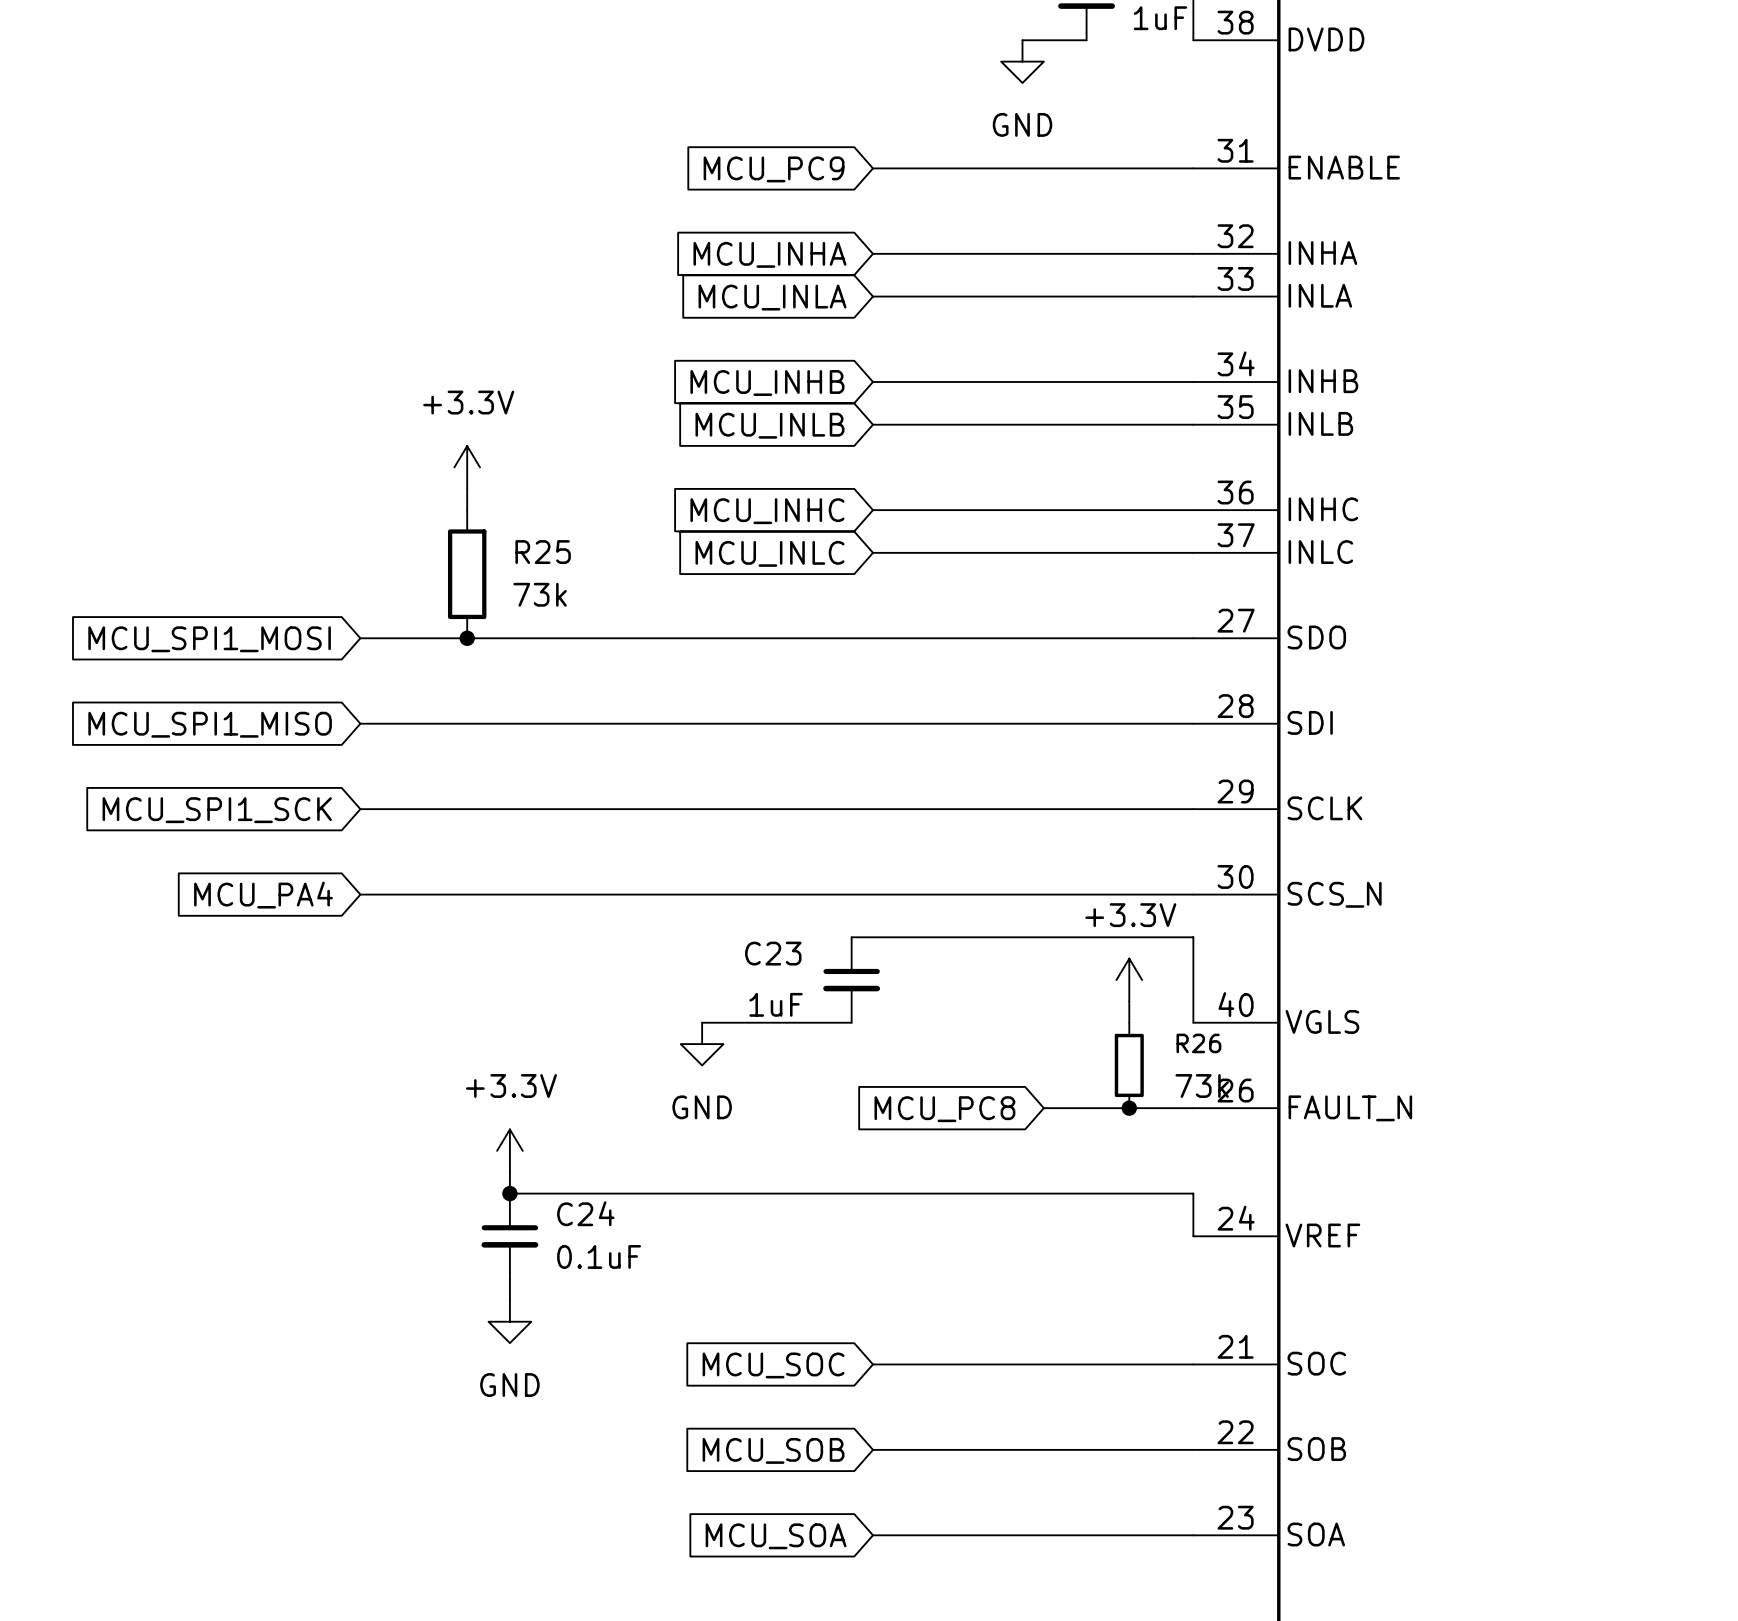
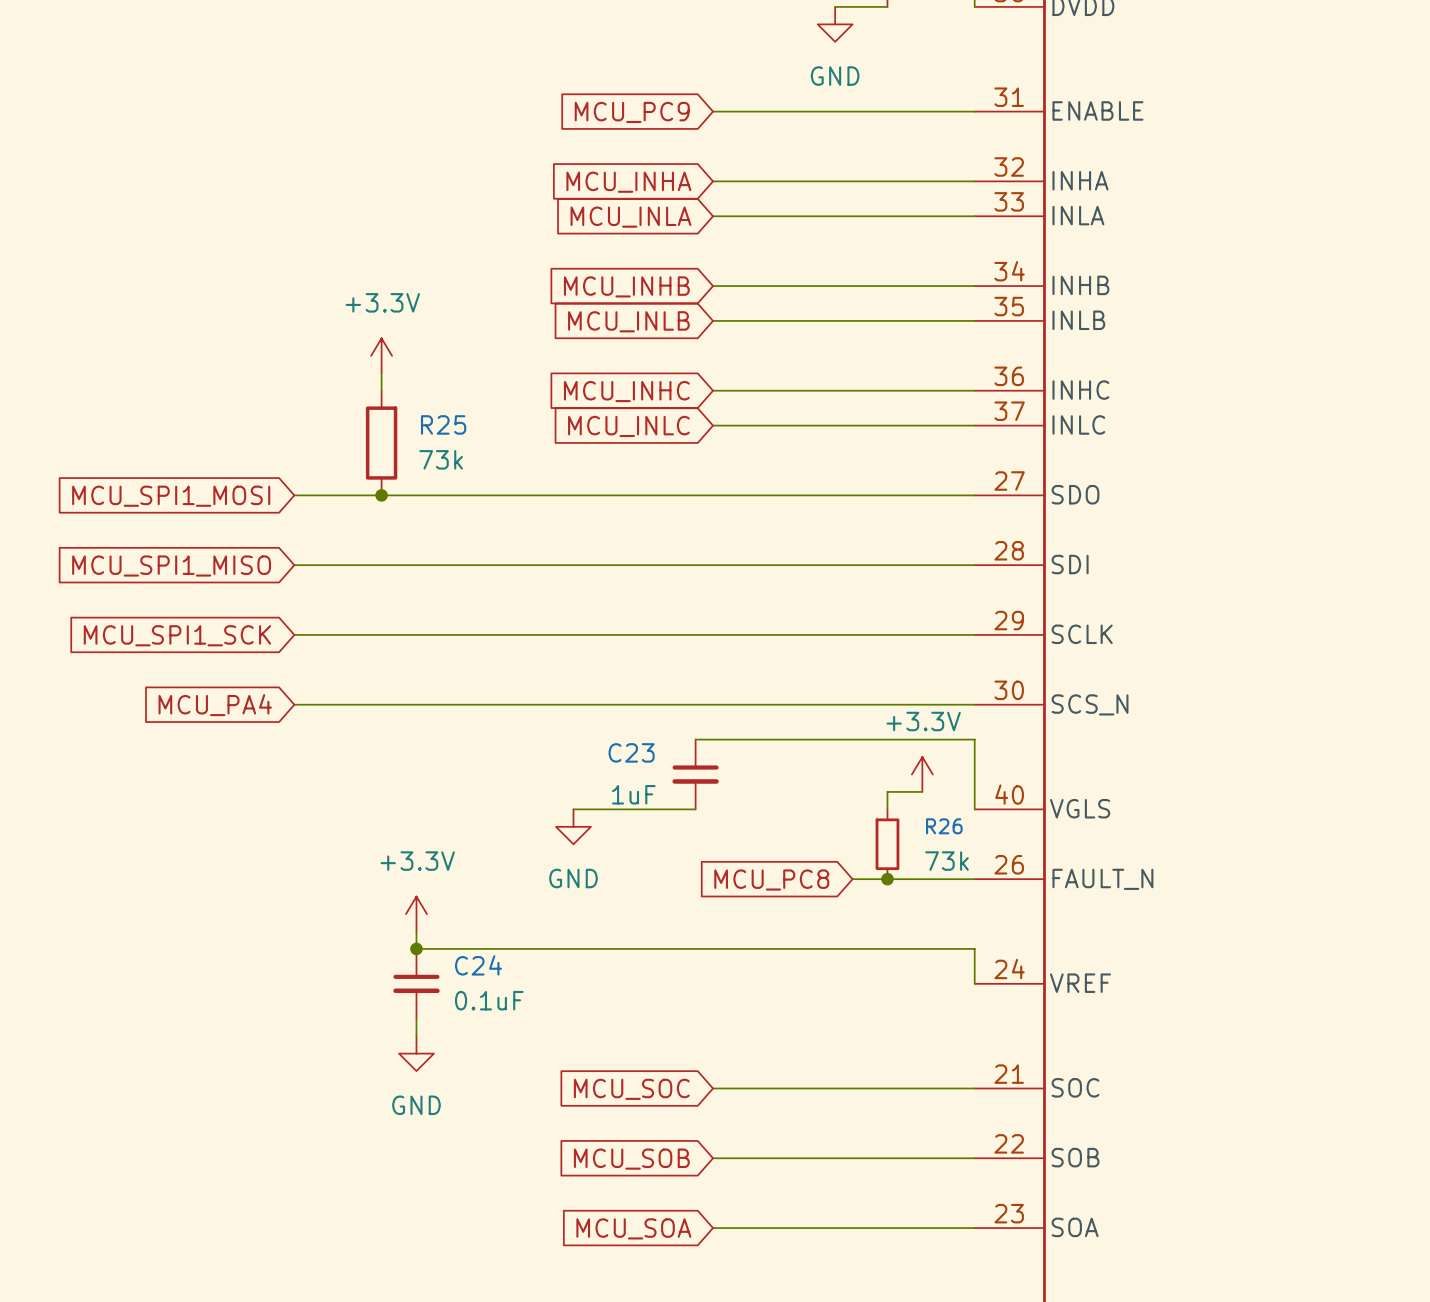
wire: (1129, 1001) (1129, 1022) -> (922, 791) (887, 791) (887, 809)
R26 position: (1129, 1065) -> (887, 844)
junction position: (1129, 1108) -> (887, 879)

